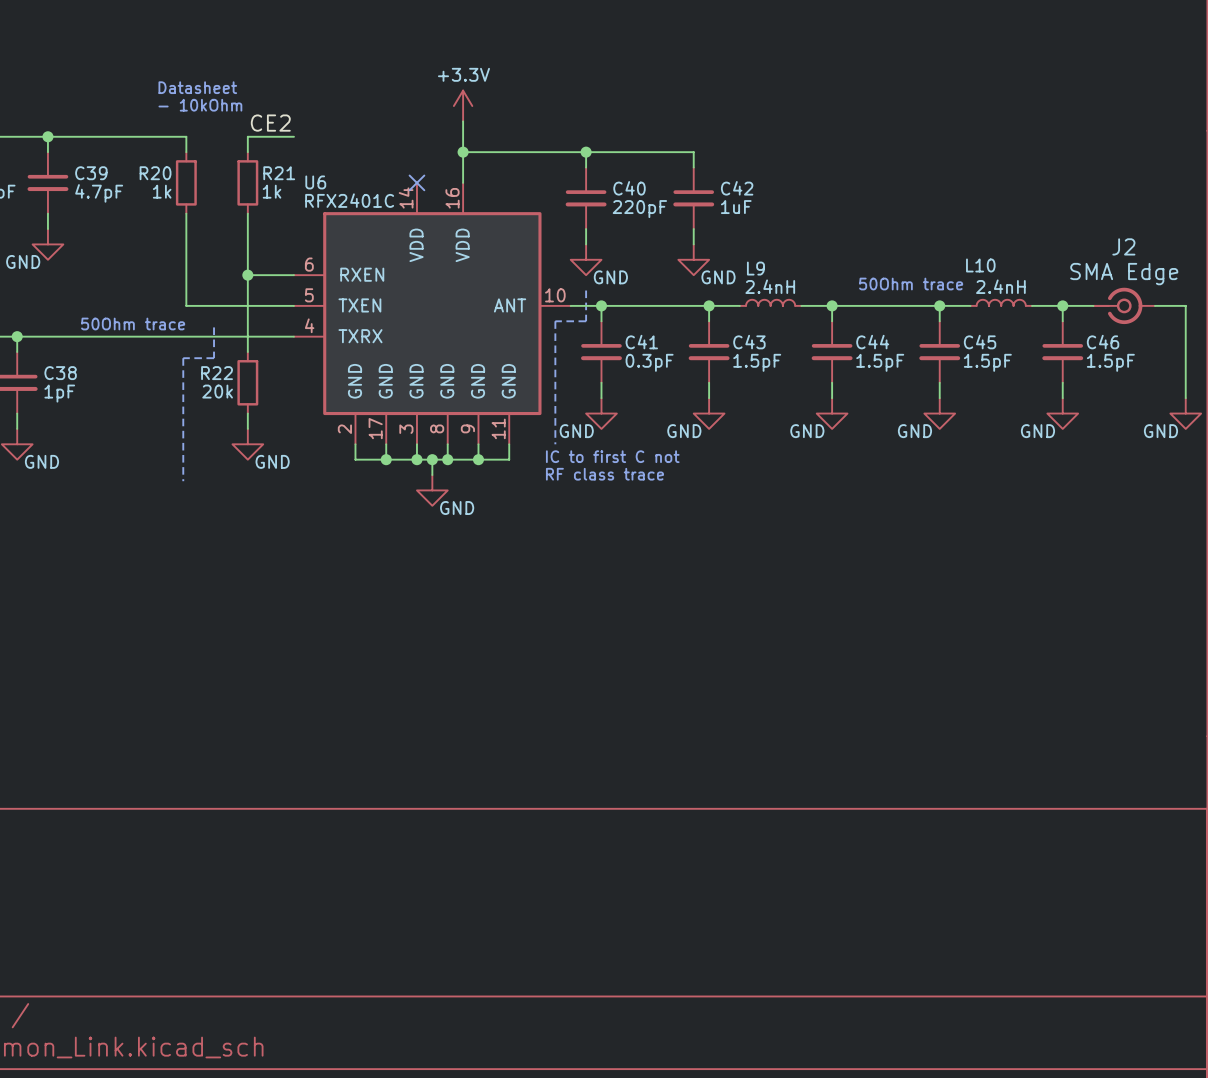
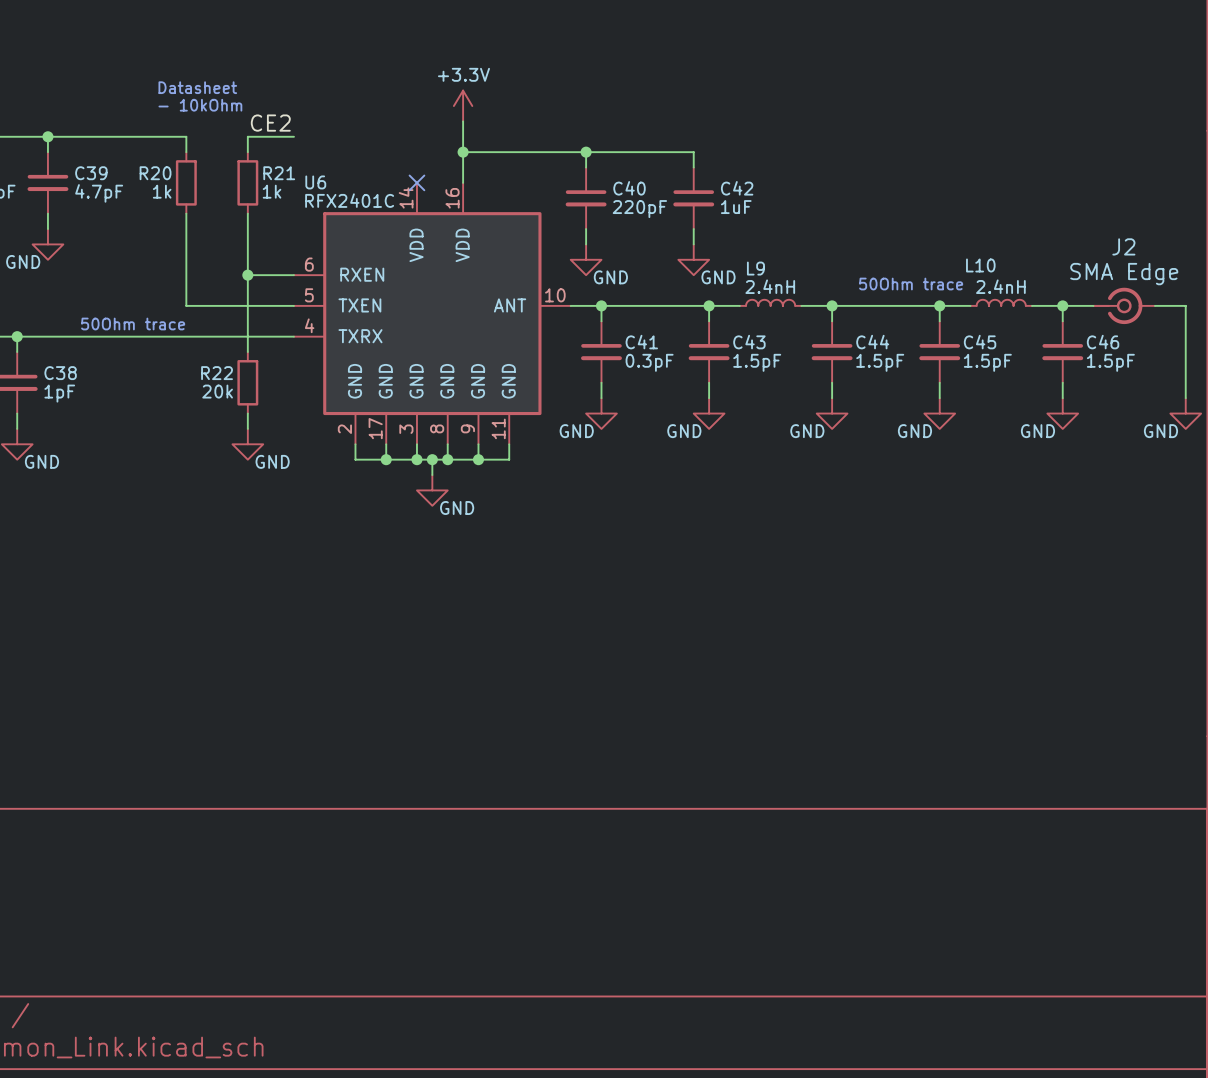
line: (586, 290) (586, 321) (555, 321) (555, 444) -> none
line: (214, 327) (214, 358) (183, 358) (183, 481) -> none
text: IC to first C not (612, 456) -> none
text: RF class trace (604, 474) -> none

